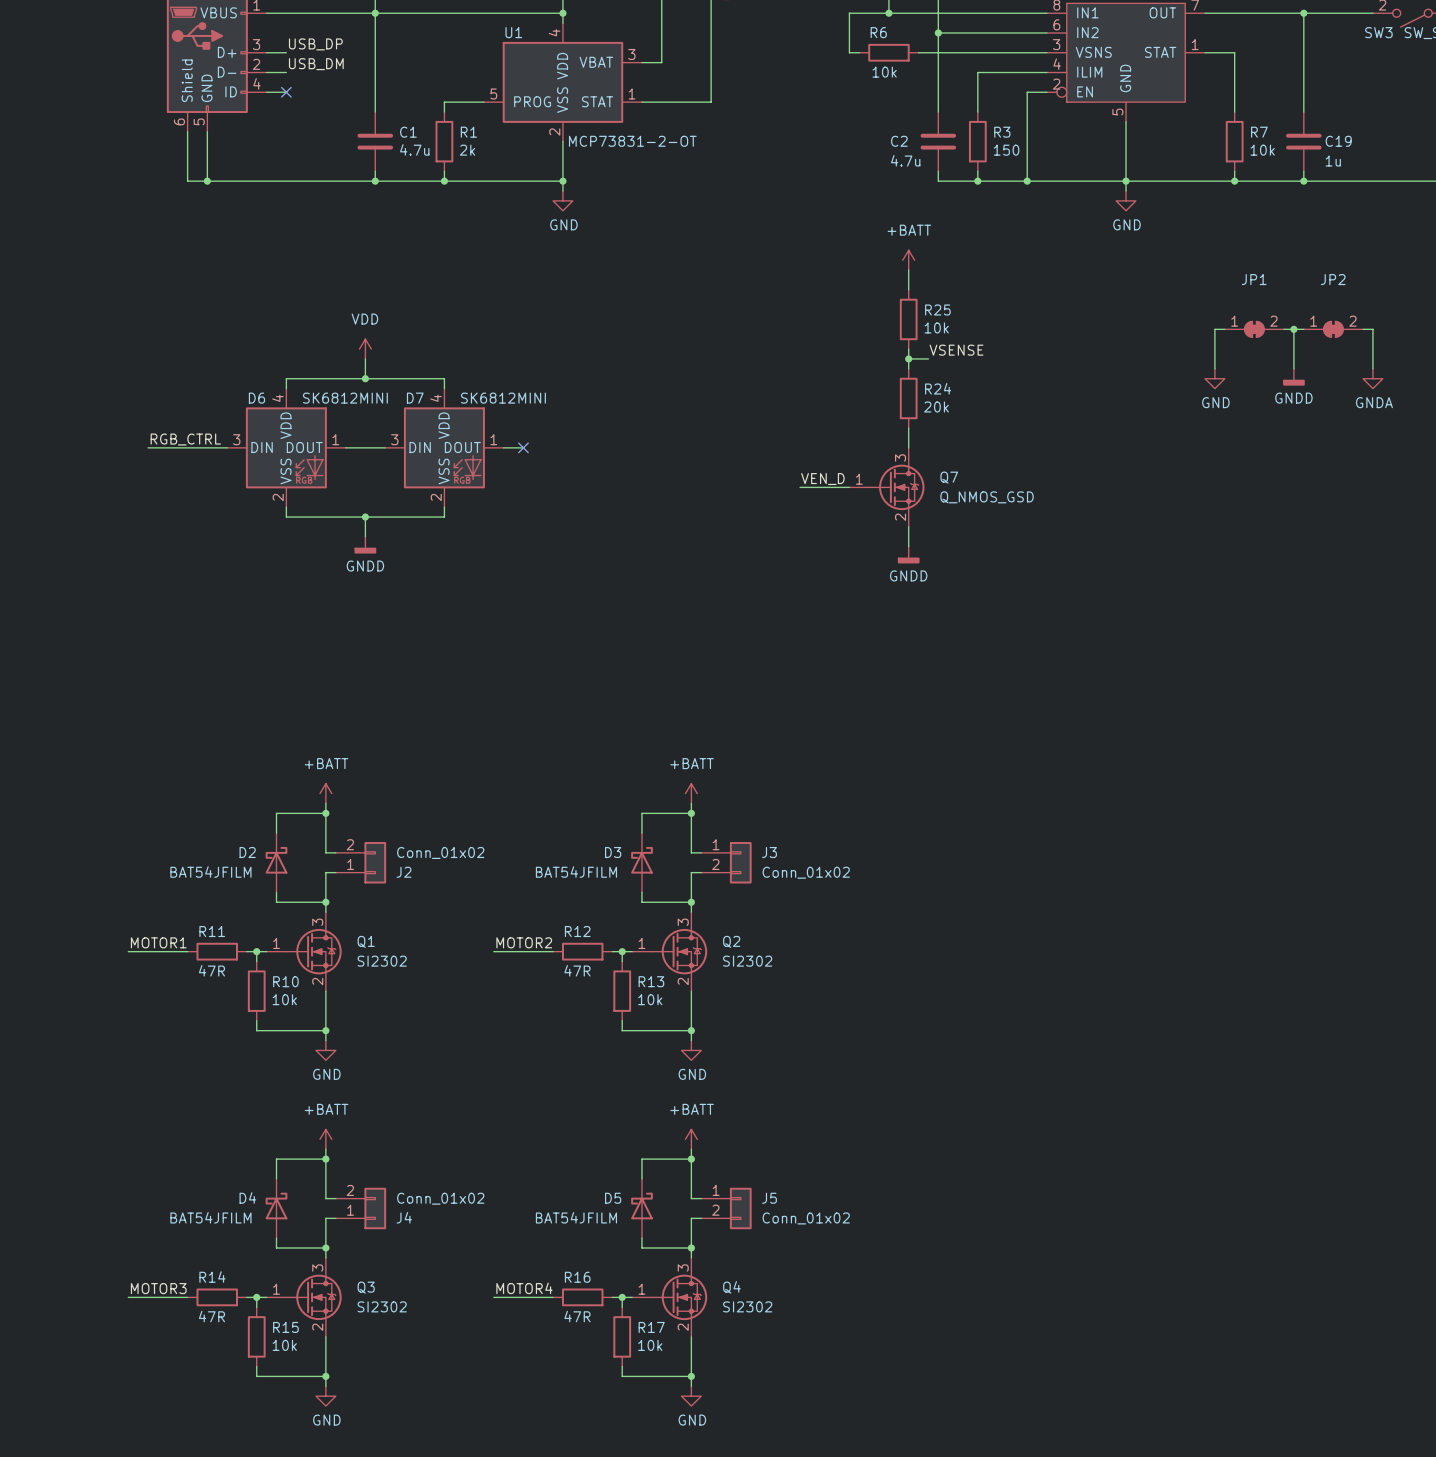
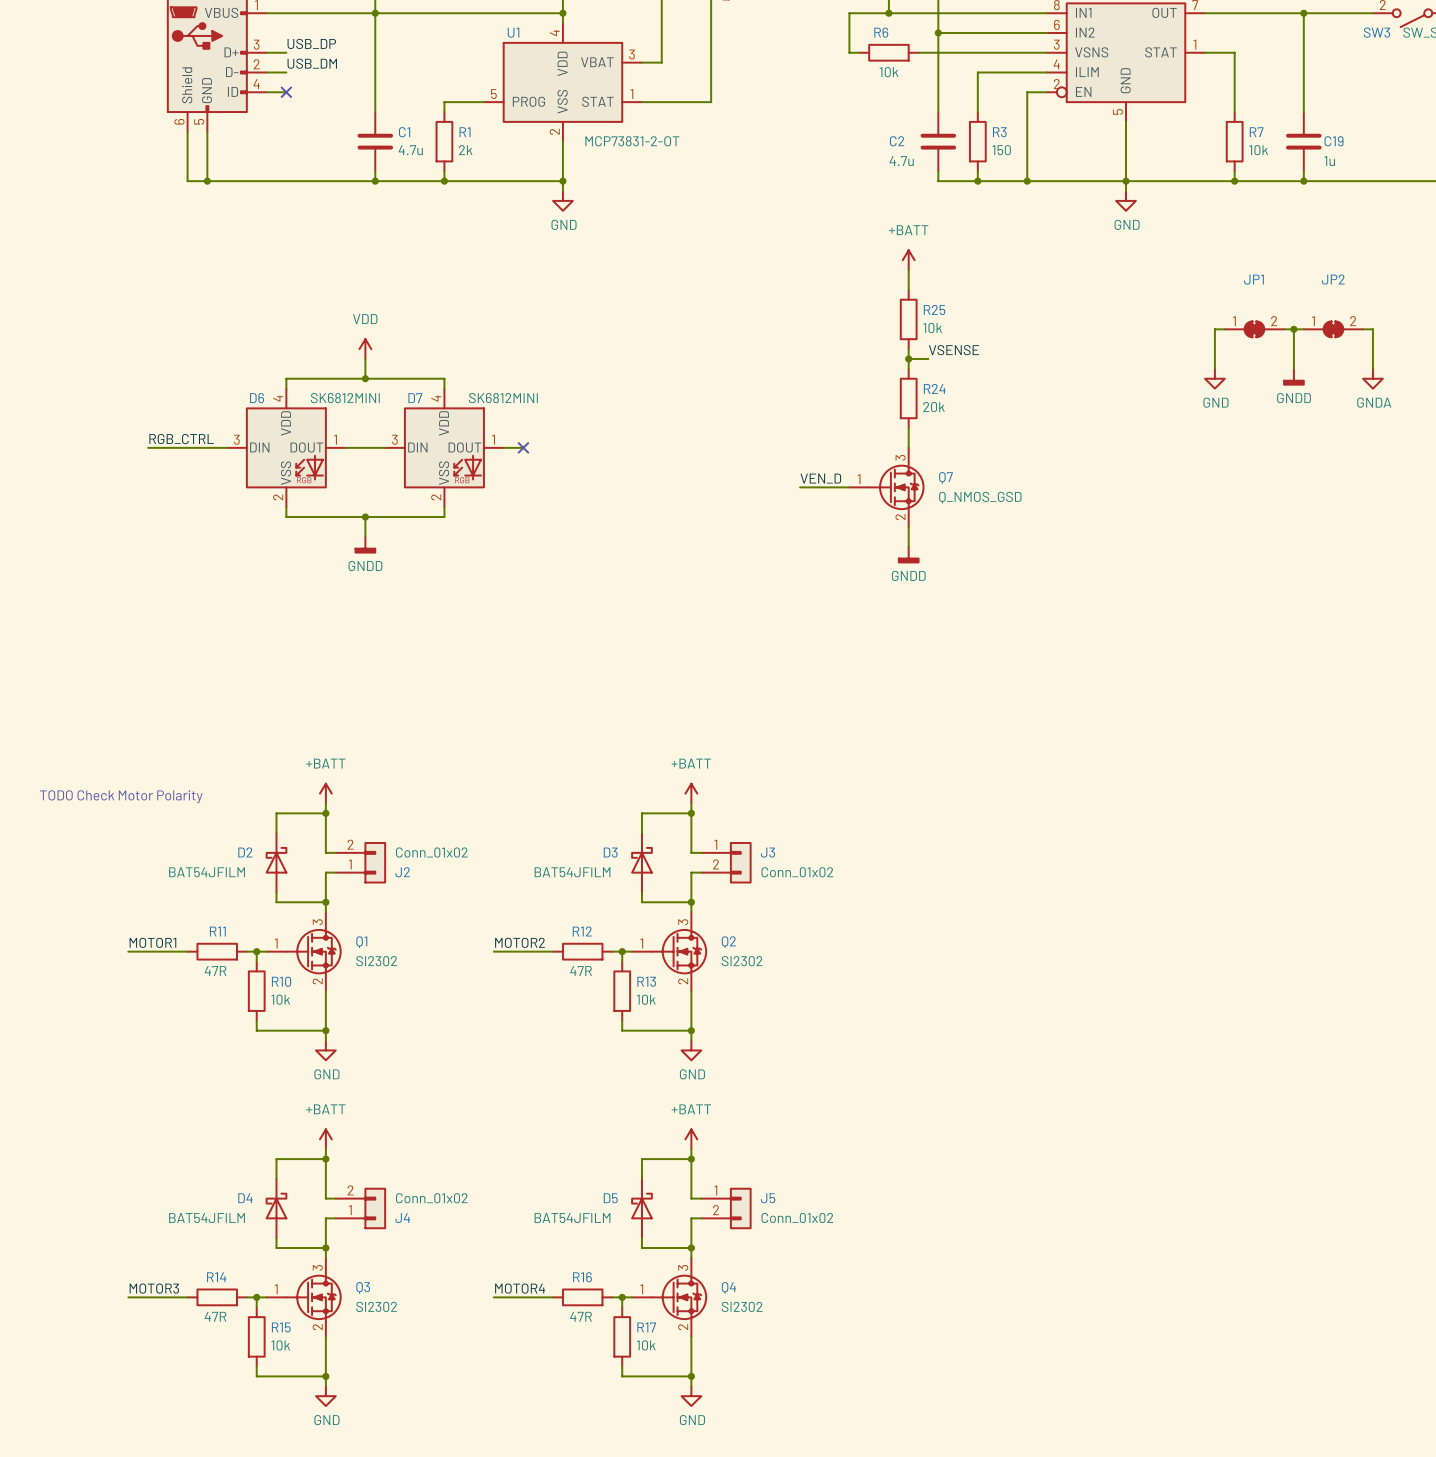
text: none -> TODO Check Motor Polarity (121, 796)

